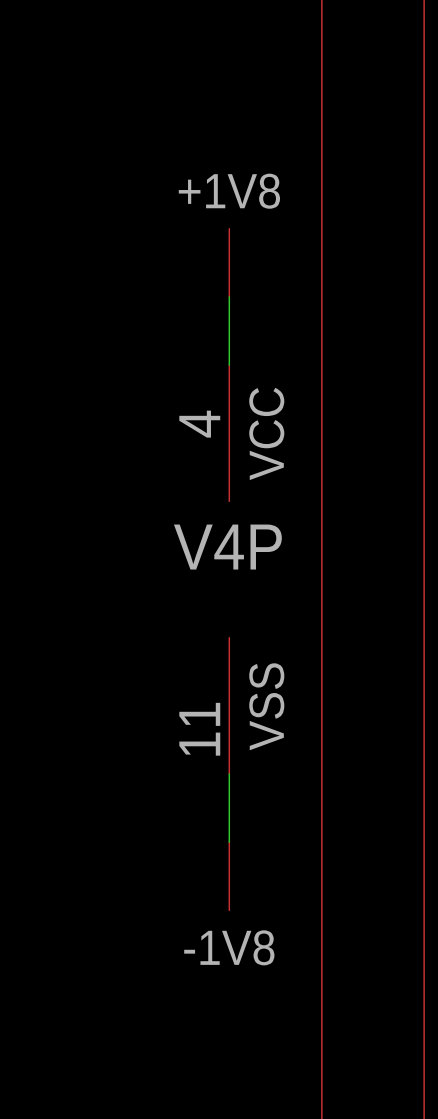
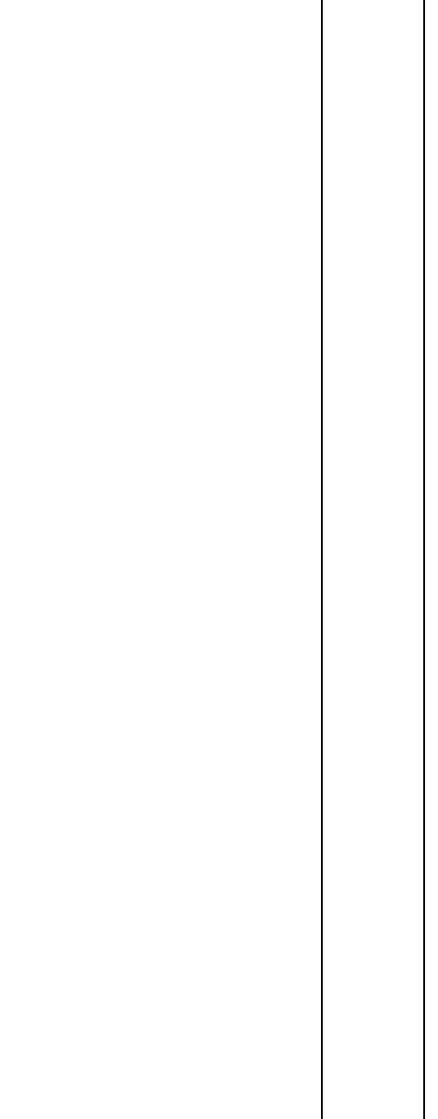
power symbol: +1V8 (229, 262) -> none
wire: (229, 296) (229, 365) -> none
V4P: (229, 569) -> none
wire: (229, 774) (229, 842) -> none
power symbol: -1V8 (229, 876) -> none

